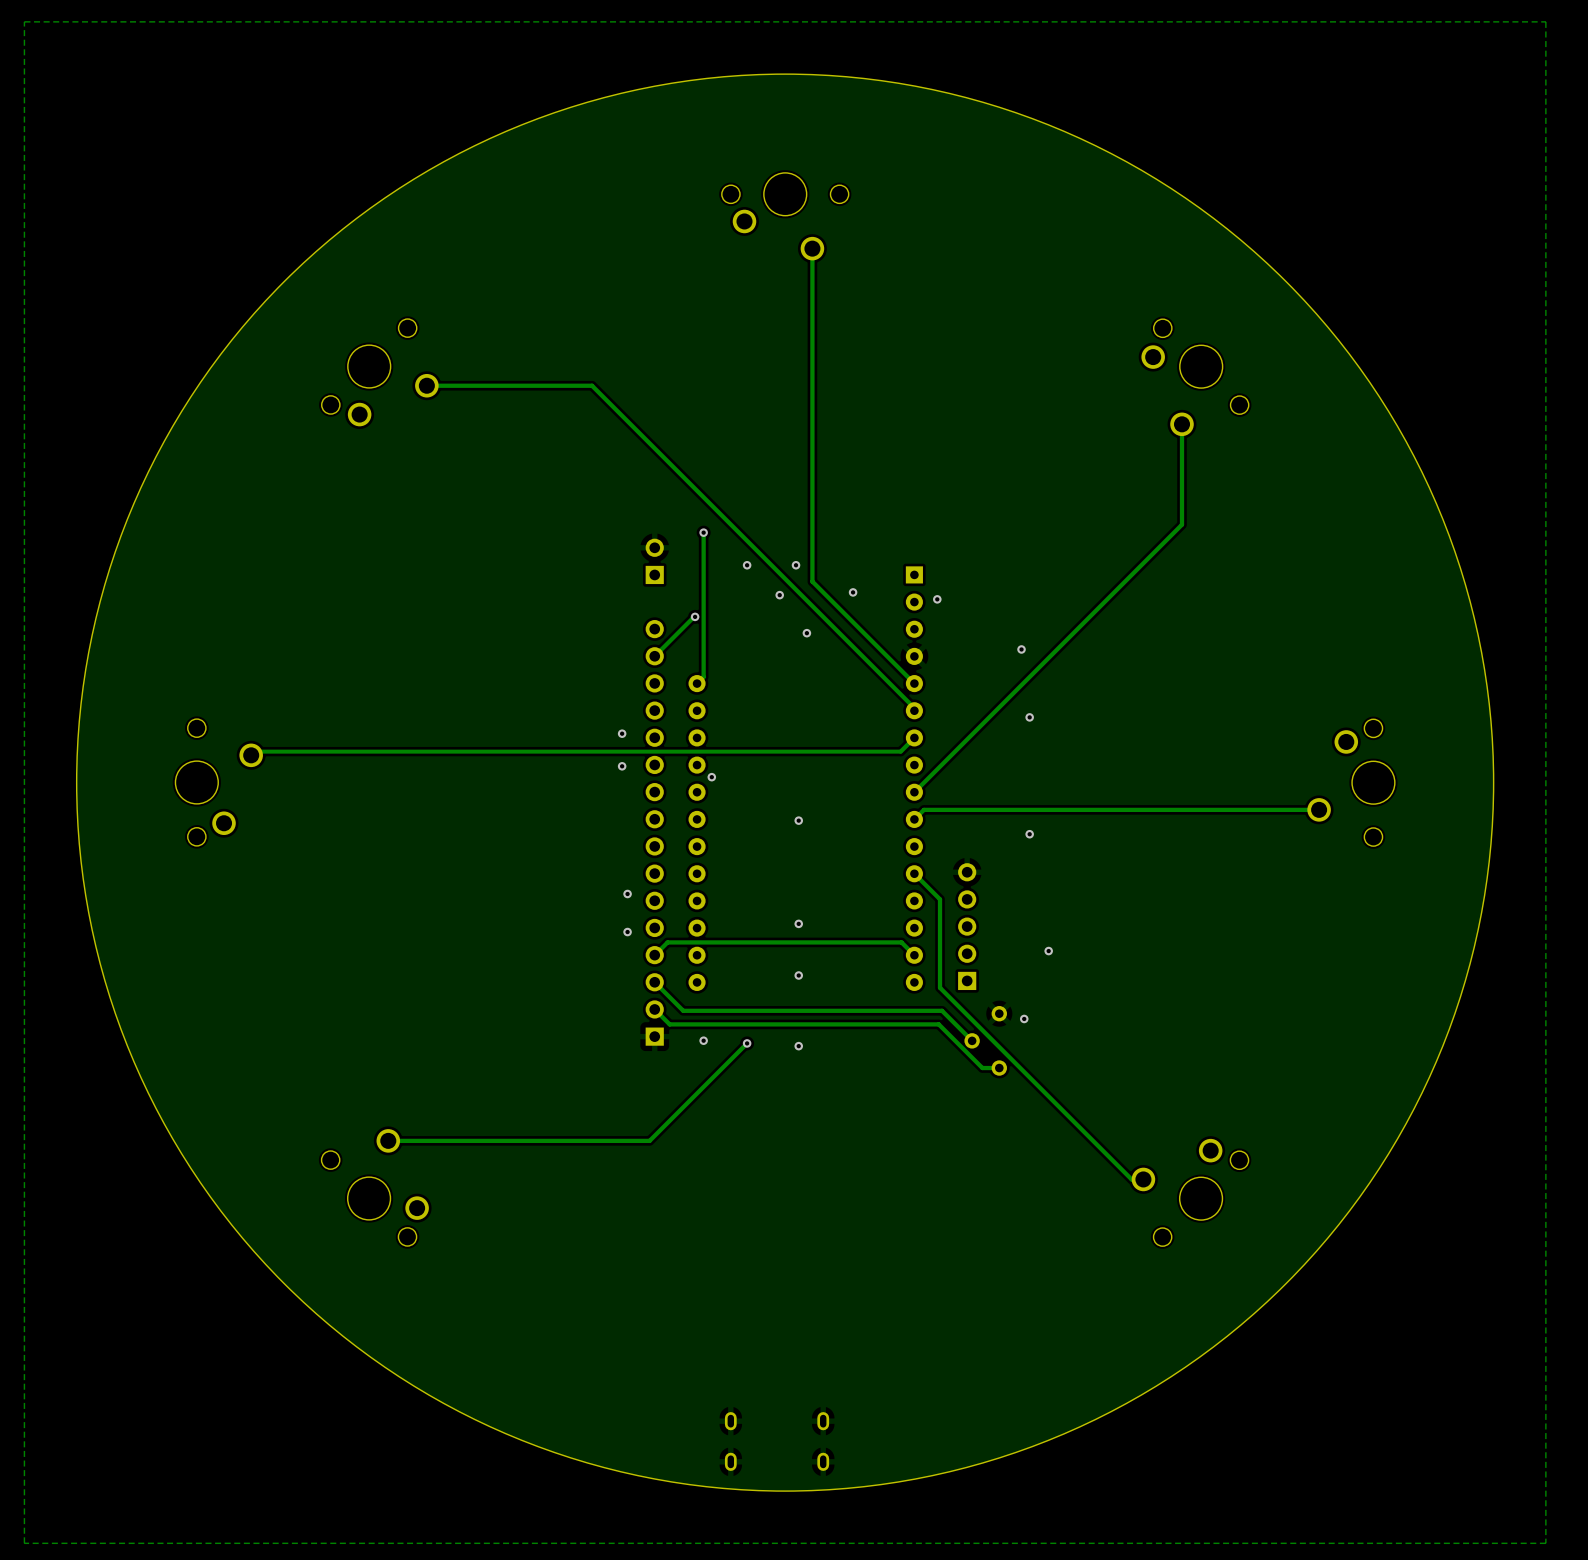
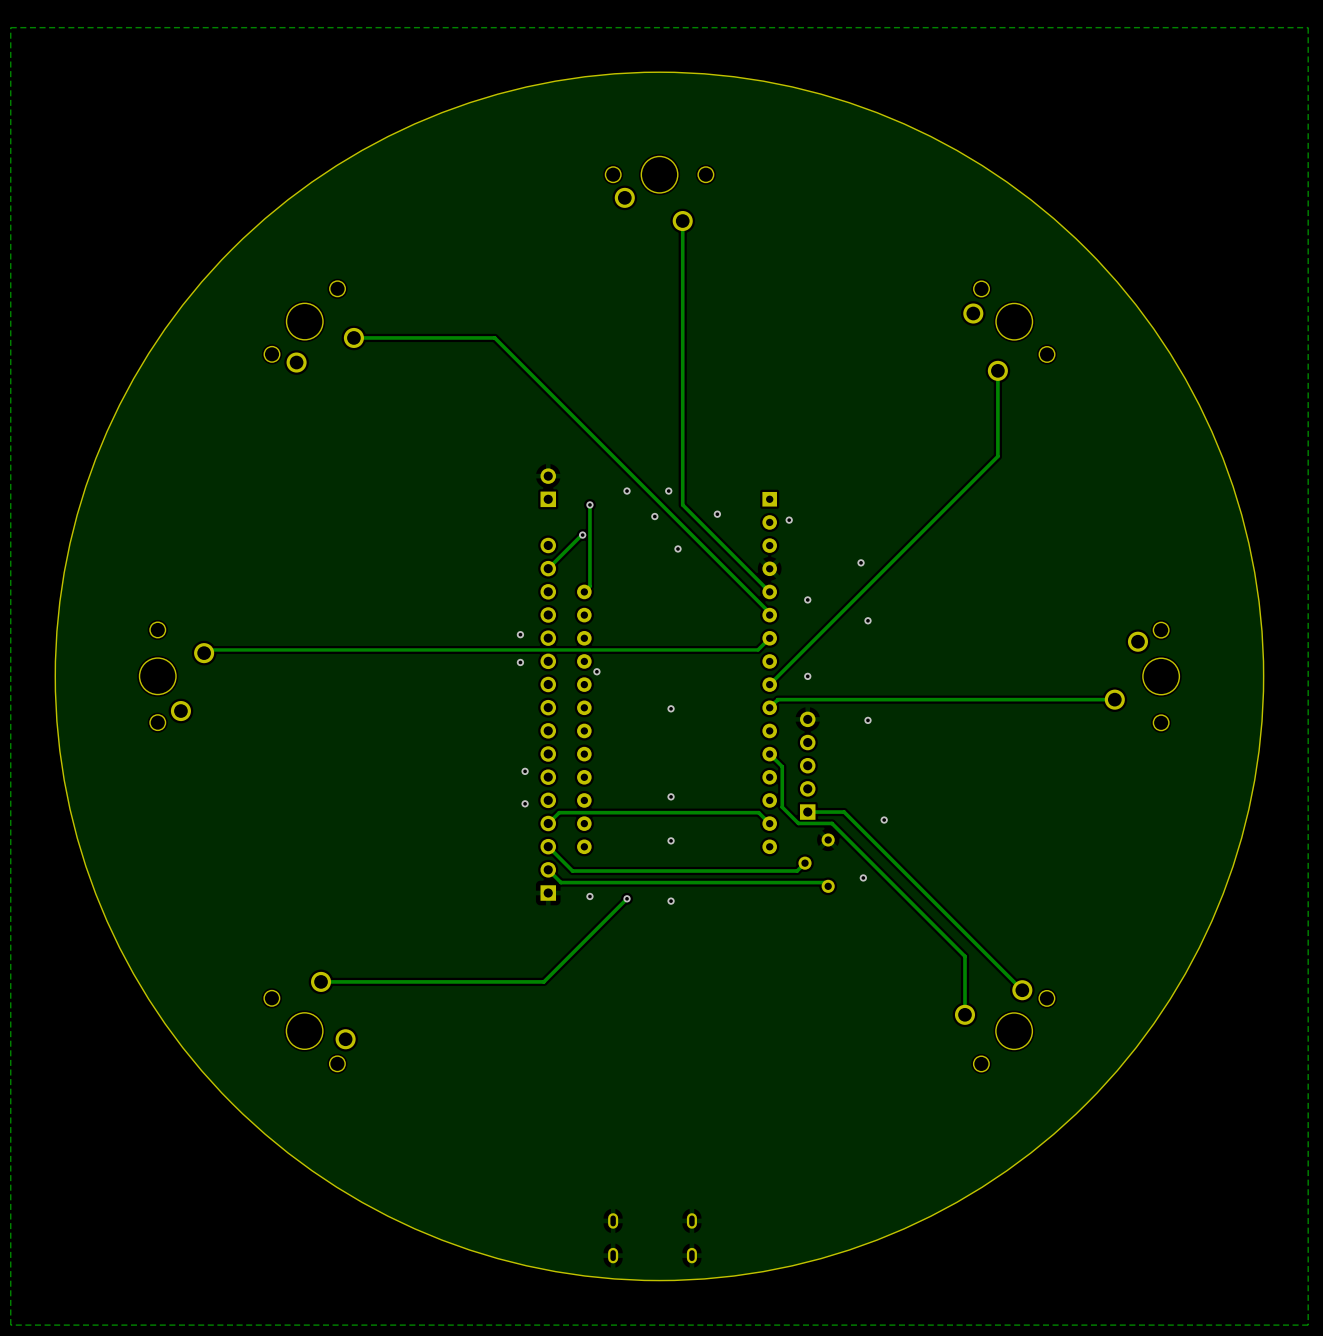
track: (703, 532) (703, 581) -> none
via position: (703, 532) -> (589, 504)
via: none -> (807, 599)
via: none -> (807, 676)
track: (929, 888) (940, 899) (940, 987) (1131, 1179) (1143, 1179) -> (782, 766) (782, 807) (798, 823) (832, 823) (964, 956) (964, 1014)
part position: (967, 926) -> (807, 765)
track: none -> (807, 812) (844, 812) (1022, 990)
track: (942, 1010) (972, 1040) -> (793, 871) (797, 871) (805, 863)
track: (938, 1024) (982, 1068) (999, 1068) -> (790, 882) (824, 882) (828, 886)
part position: (985, 1040) -> (816, 863)

